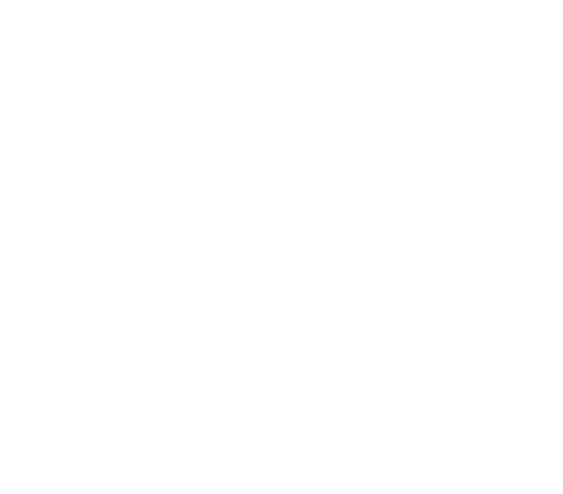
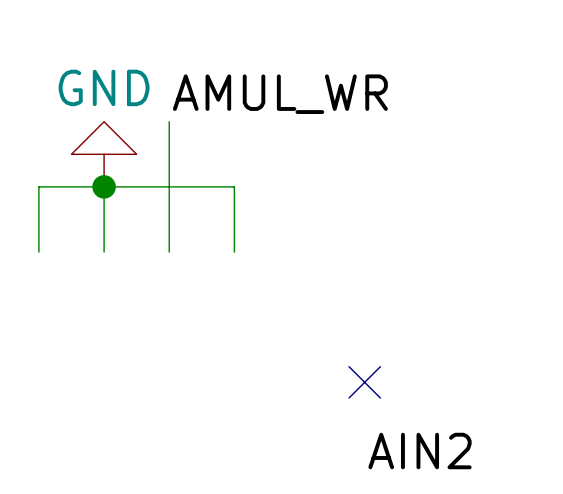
label: none -> AMUL_WR (280, 94)
wire: none -> (169, 121) (169, 252)
power symbol: none -> GND (104, 154)
wire: none -> (104, 186) (104, 252)
junction: none -> (104, 186)
wire: none -> (38, 252) (38, 186) (234, 186) (234, 252)
no-connect mark: none -> (364, 382)
label: none -> AIN2 (420, 451)

